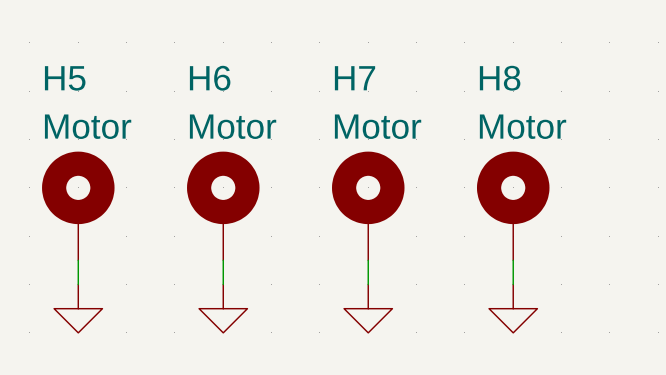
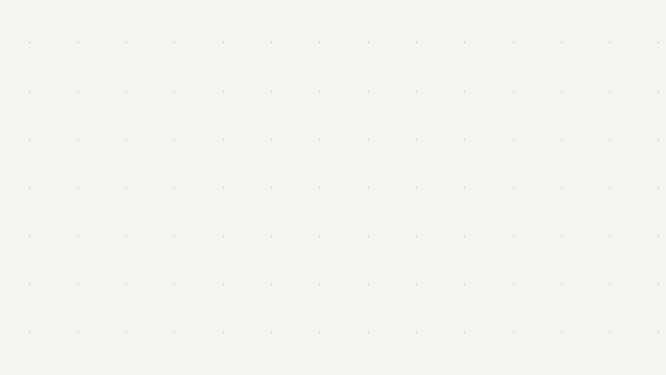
H5: Motor (78, 205) -> none
H6: Motor (223, 205) -> none
H7: Motor (368, 205) -> none
H8: Motor (513, 205) -> none
wire: (78, 260) (78, 284) -> none
wire: (223, 260) (223, 284) -> none
wire: (368, 260) (368, 284) -> none
wire: (513, 260) (513, 284) -> none
power symbol: (78, 308) -> none
power symbol: (223, 308) -> none
power symbol: (368, 308) -> none
power symbol: (513, 308) -> none

